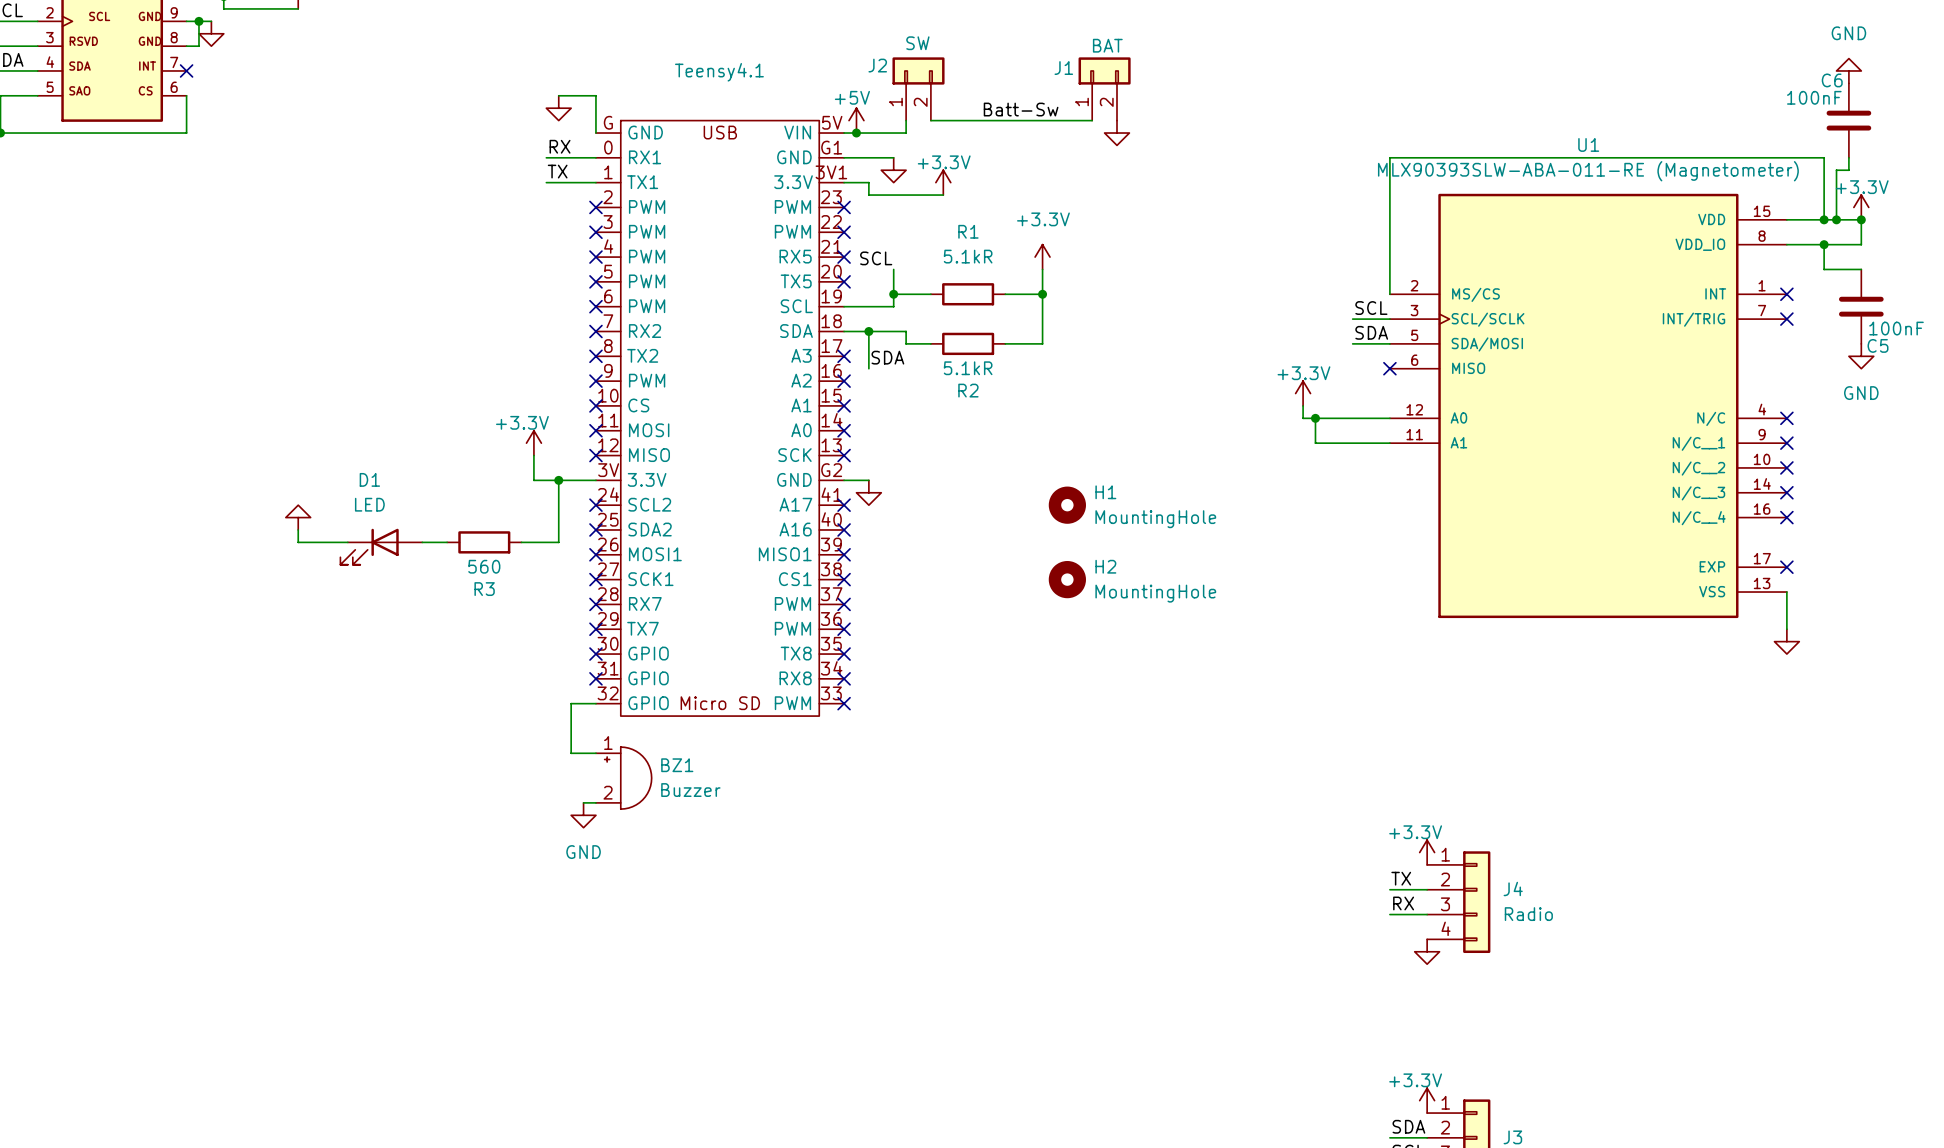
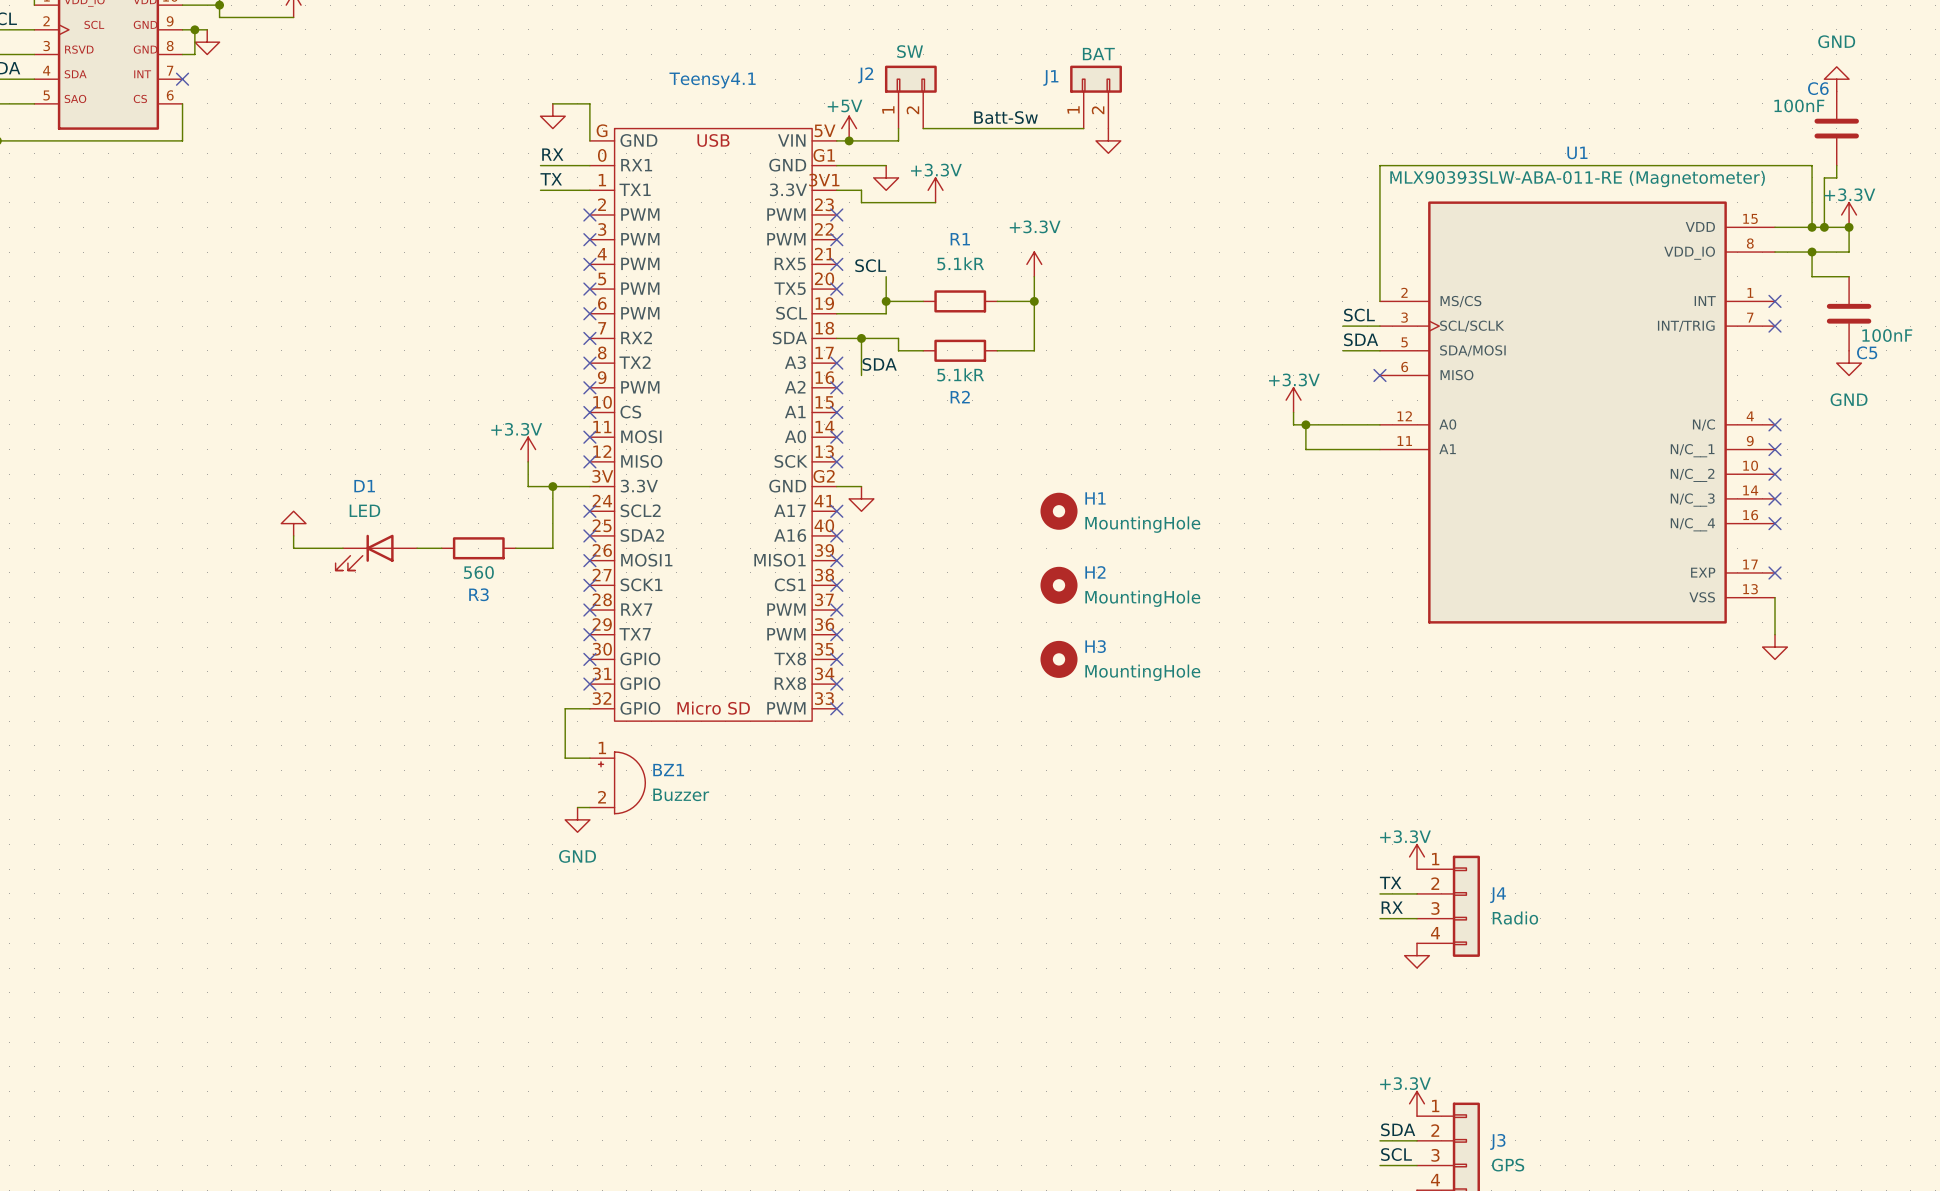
H3: none -> MountingHole (1059, 659)

